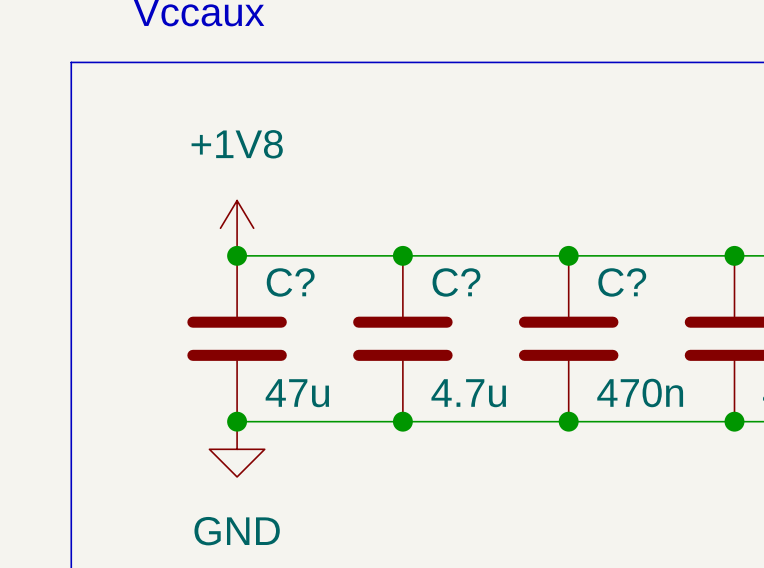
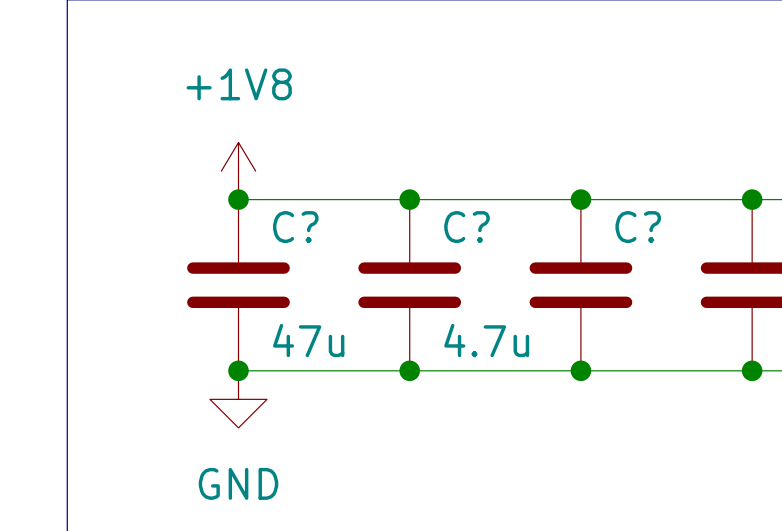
C? value: 470n (640, 393) -> none

